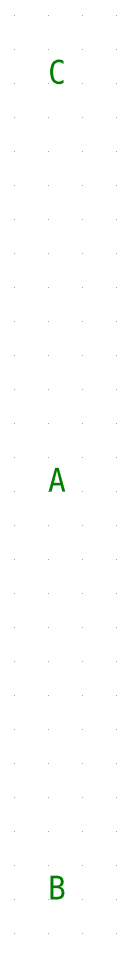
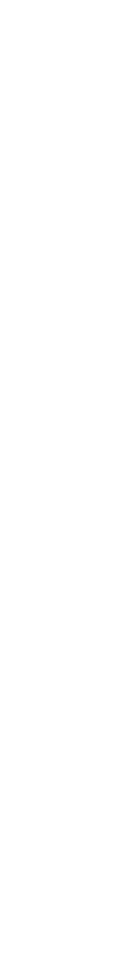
text: C (56, 71) -> none
text: A (56, 479) -> none
text: B (57, 887) -> none

